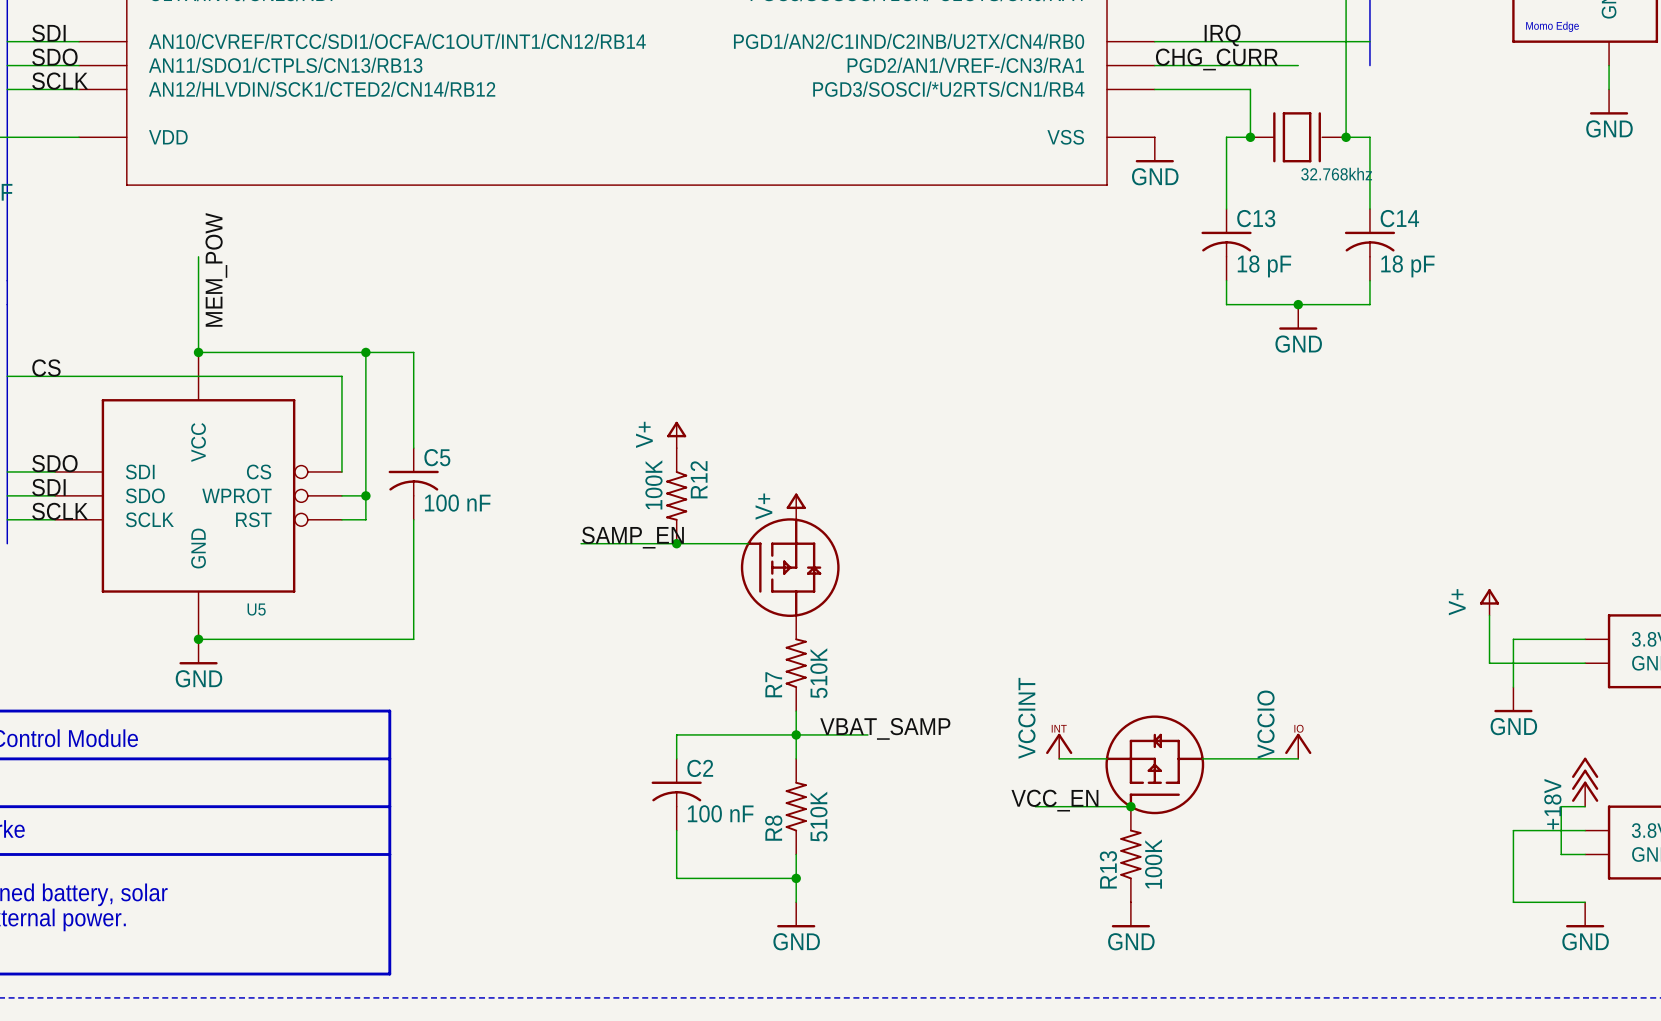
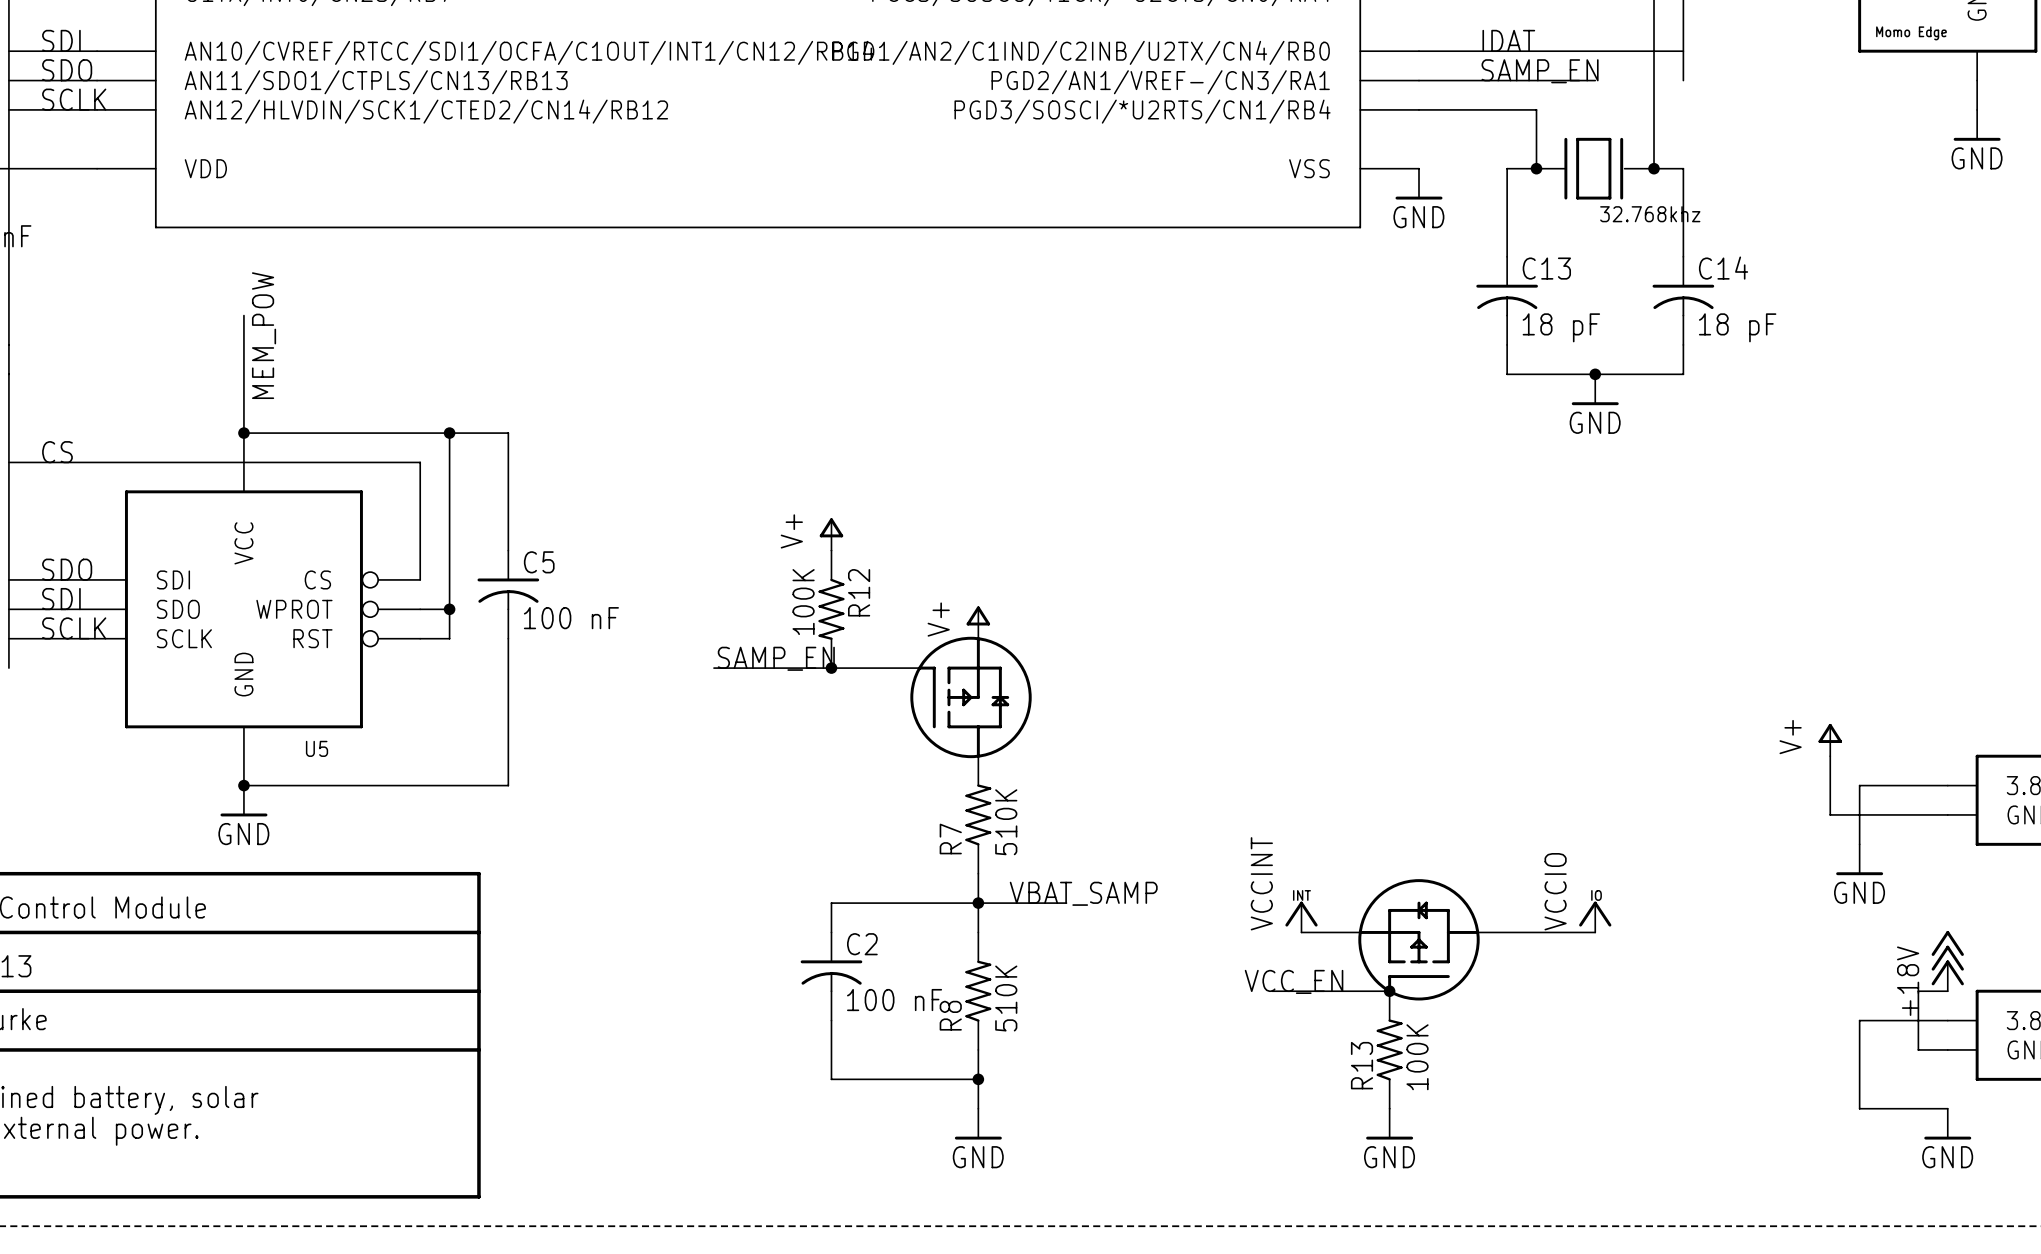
label: IRQ (1222, 35) -> IDAT (1508, 40)
label: CHG_CURR (1216, 59) -> none
label: none -> SAMP_EN (1540, 71)

